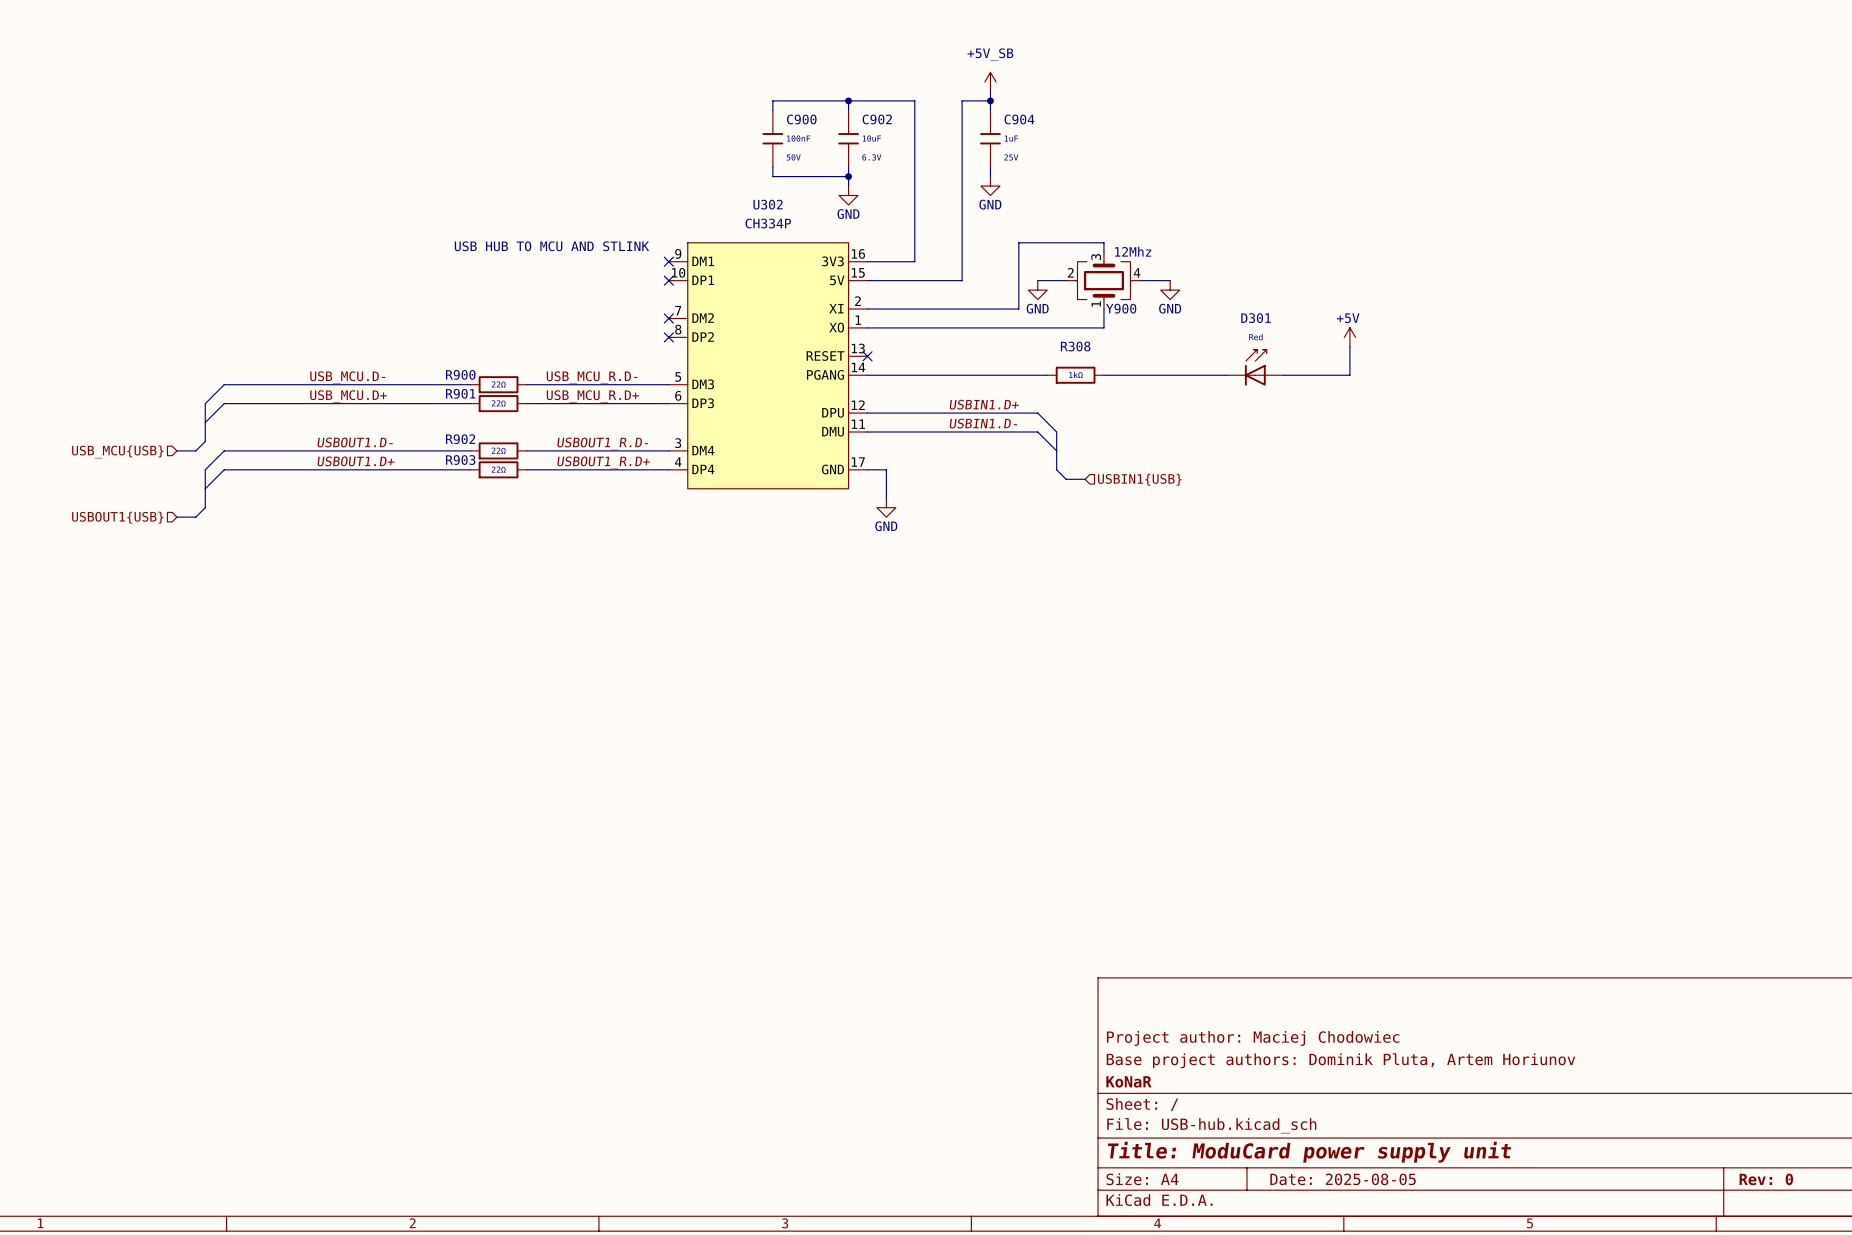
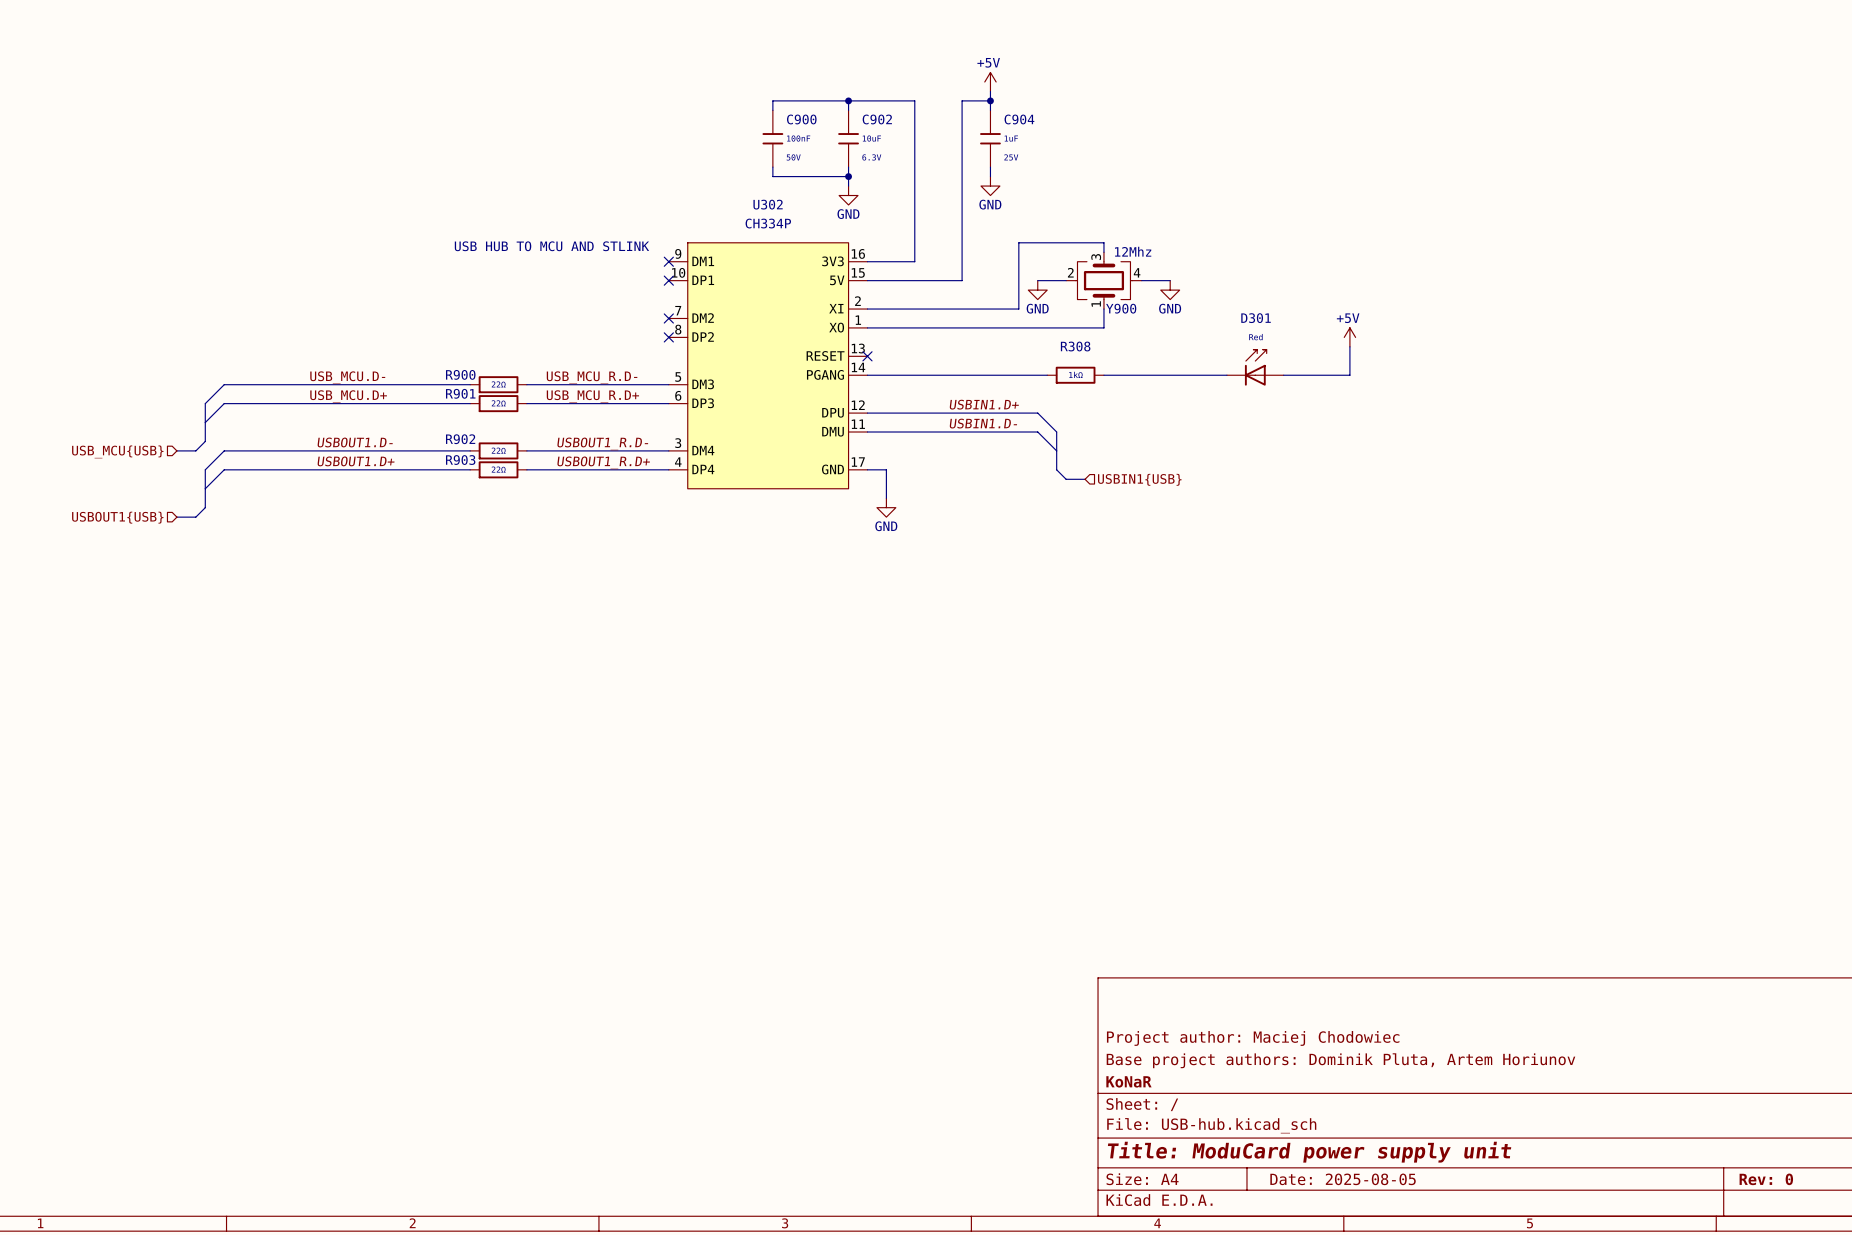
power symbol: +5V_SB (990, 81) -> +5V (990, 81)

